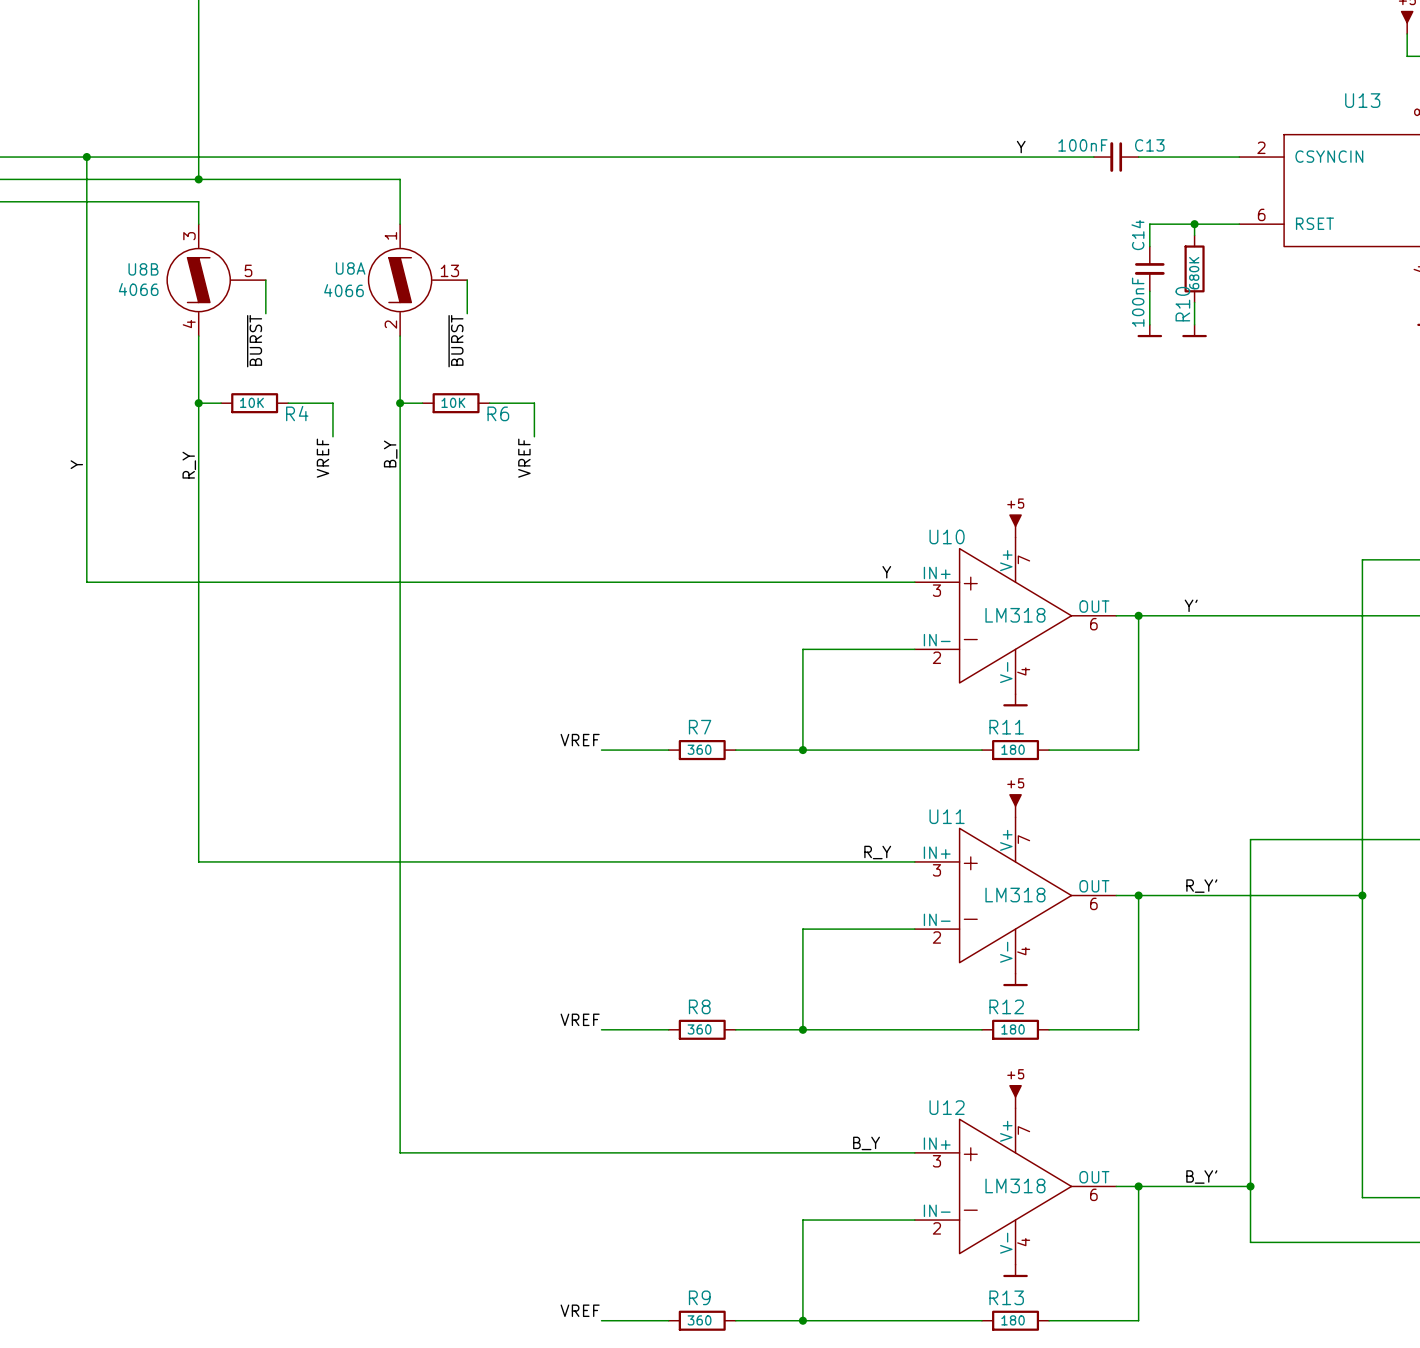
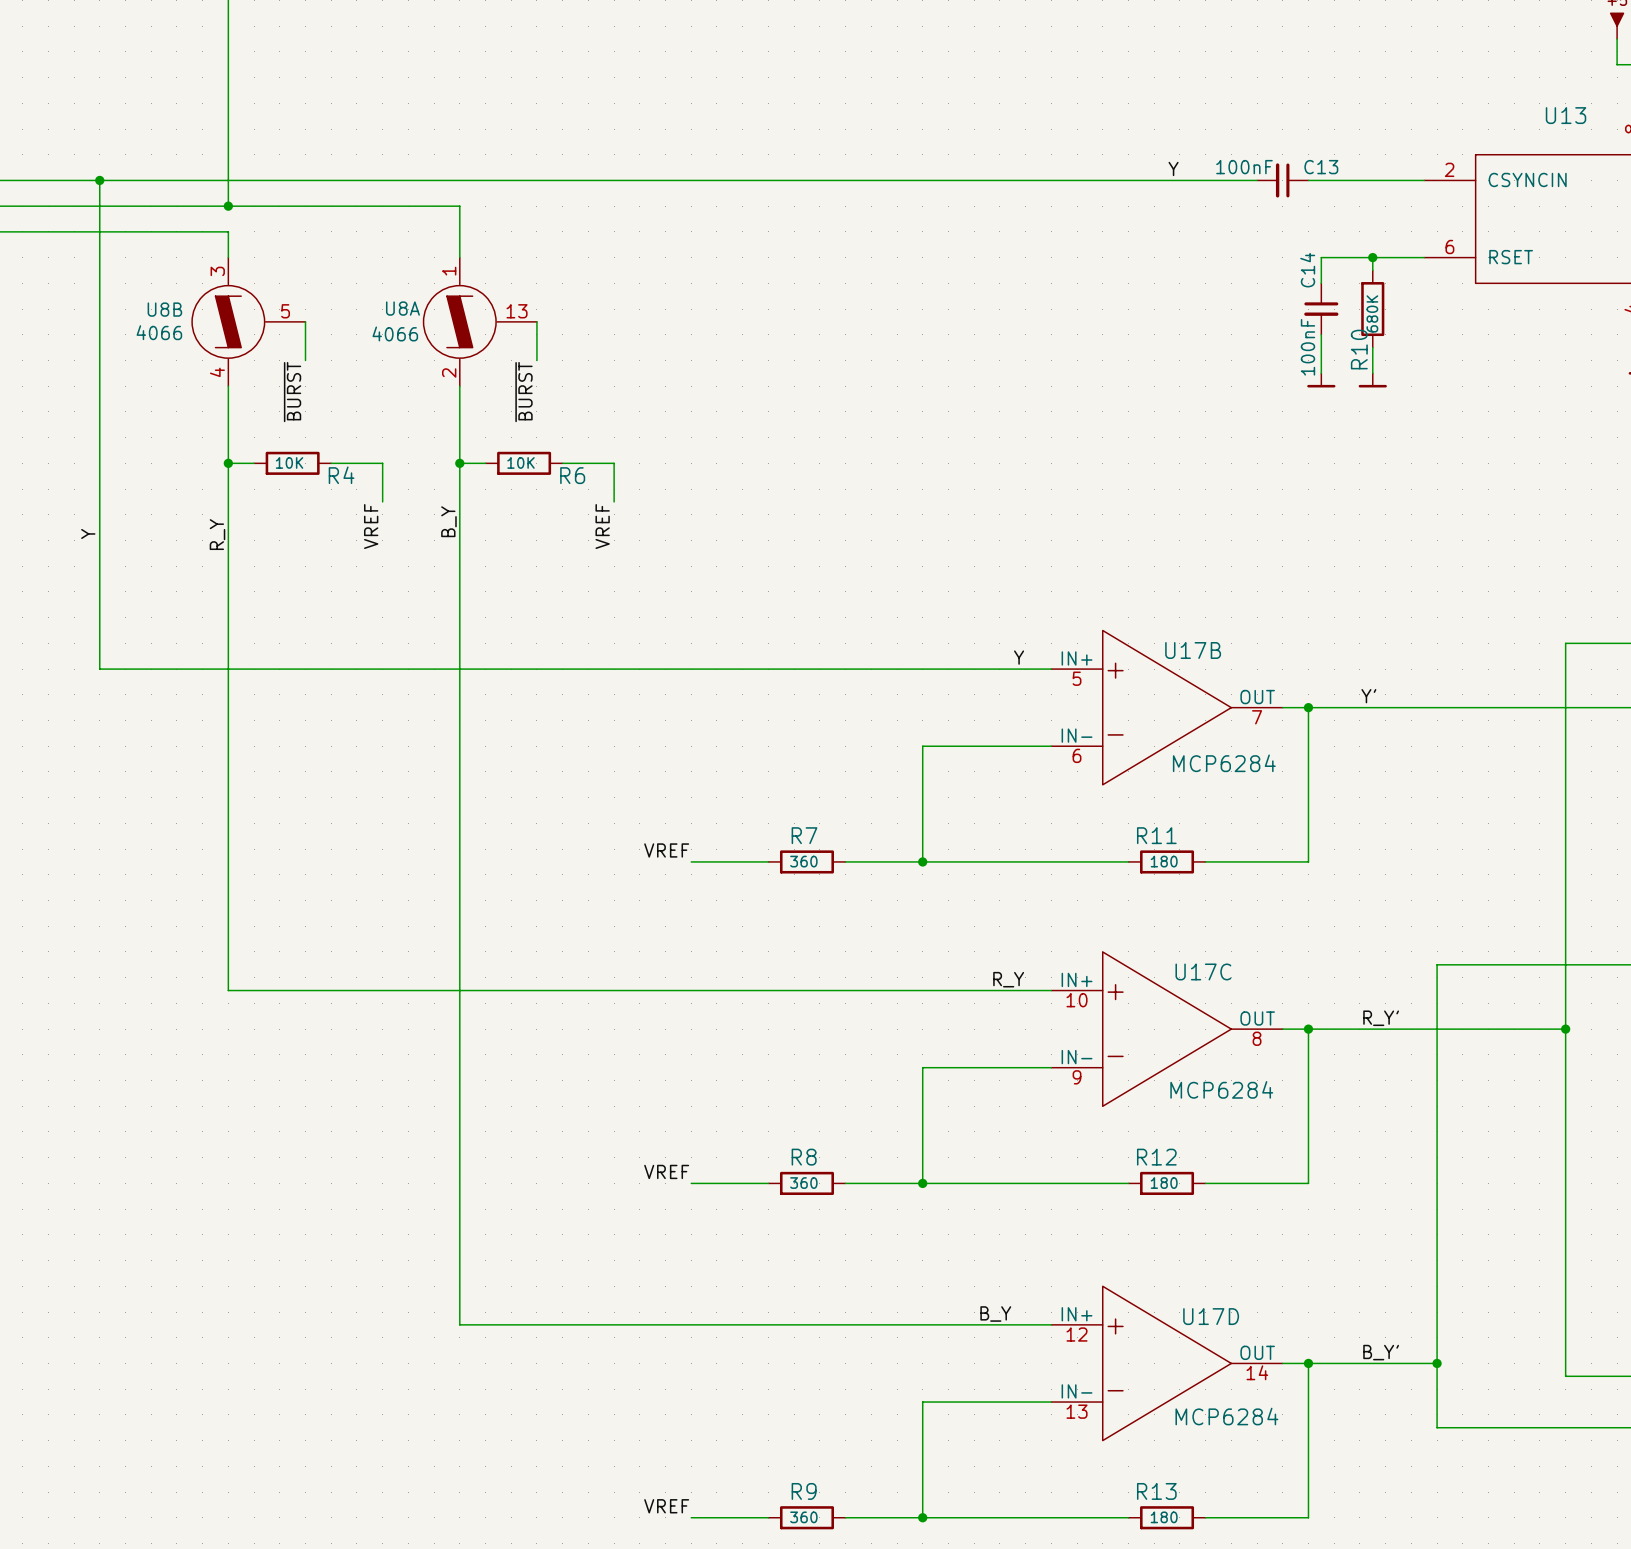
power symbol: (1015, 526) -> none
U10: LM318 (1015, 615) -> none
U17B: none -> MCP6284 (1167, 707)
power symbol: (1015, 700) -> none
power symbol: (1015, 806) -> none
U11: LM318 (1015, 895) -> none
U17C: none -> MCP6284 (1167, 1029)
power symbol: (1015, 980) -> none
power symbol: (1015, 1096) -> none
U12: LM318 (1015, 1186) -> none
U17D: none -> MCP6284 (1167, 1363)
power symbol: (1015, 1270) -> none

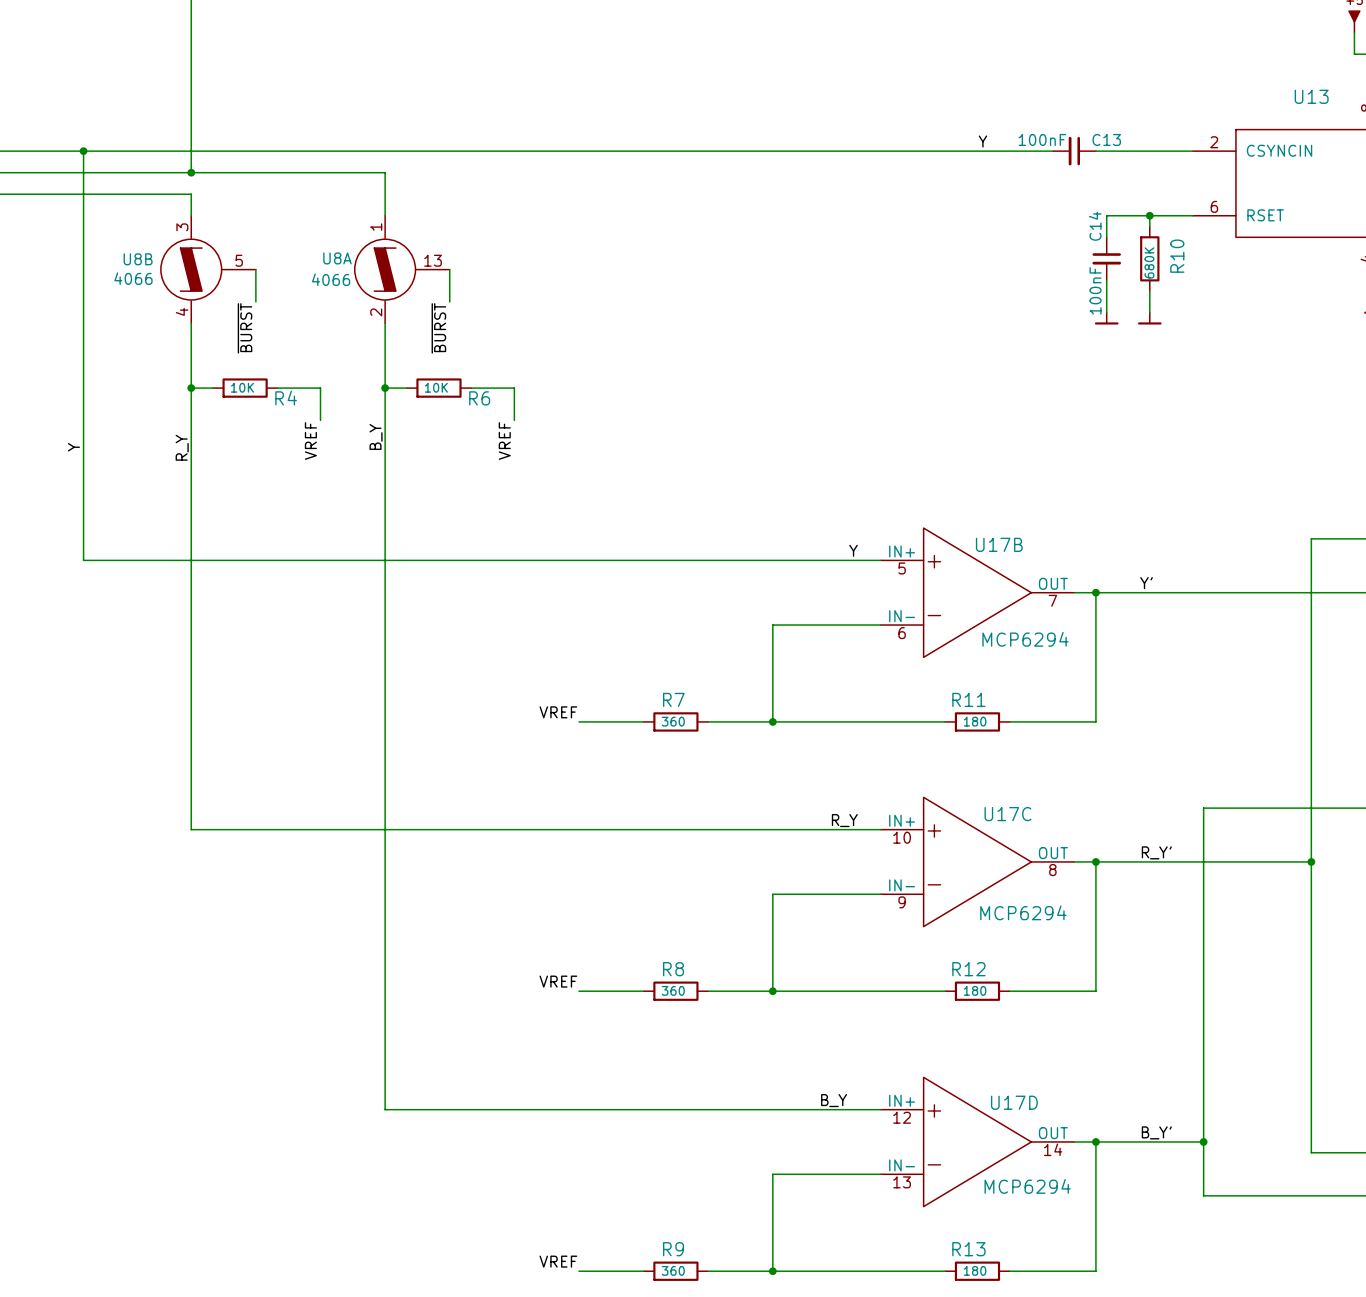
R10 name position: R10 (1359, 349) -> R10 (1177, 256)
U17B value: MCP6284 (1224, 763) -> MCP6294 (1025, 639)
U17C value: MCP6284 (1221, 1089) -> MCP6294 (1023, 912)
U17D value: MCP6284 (1226, 1416) -> MCP6294 (1027, 1186)

